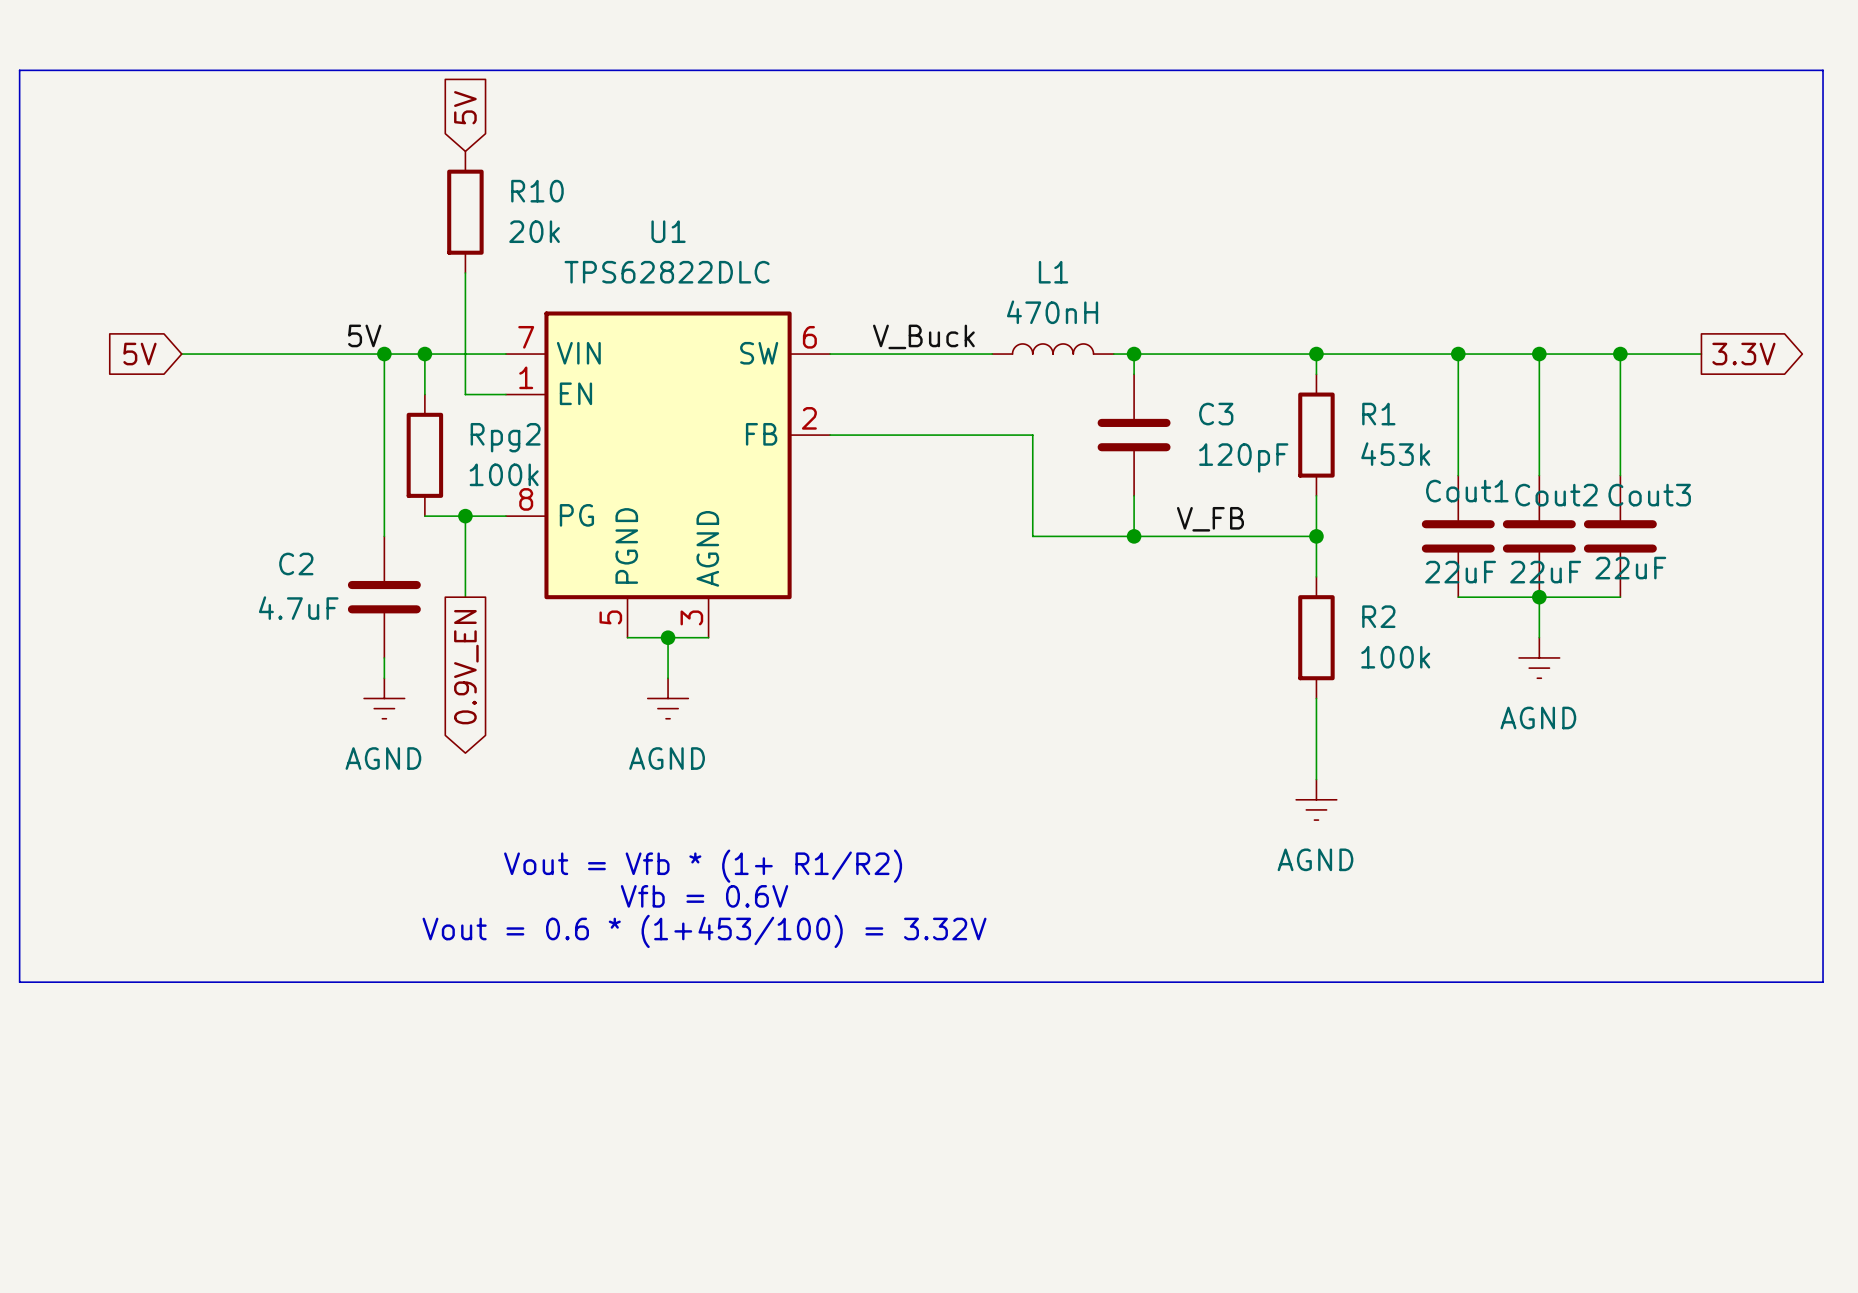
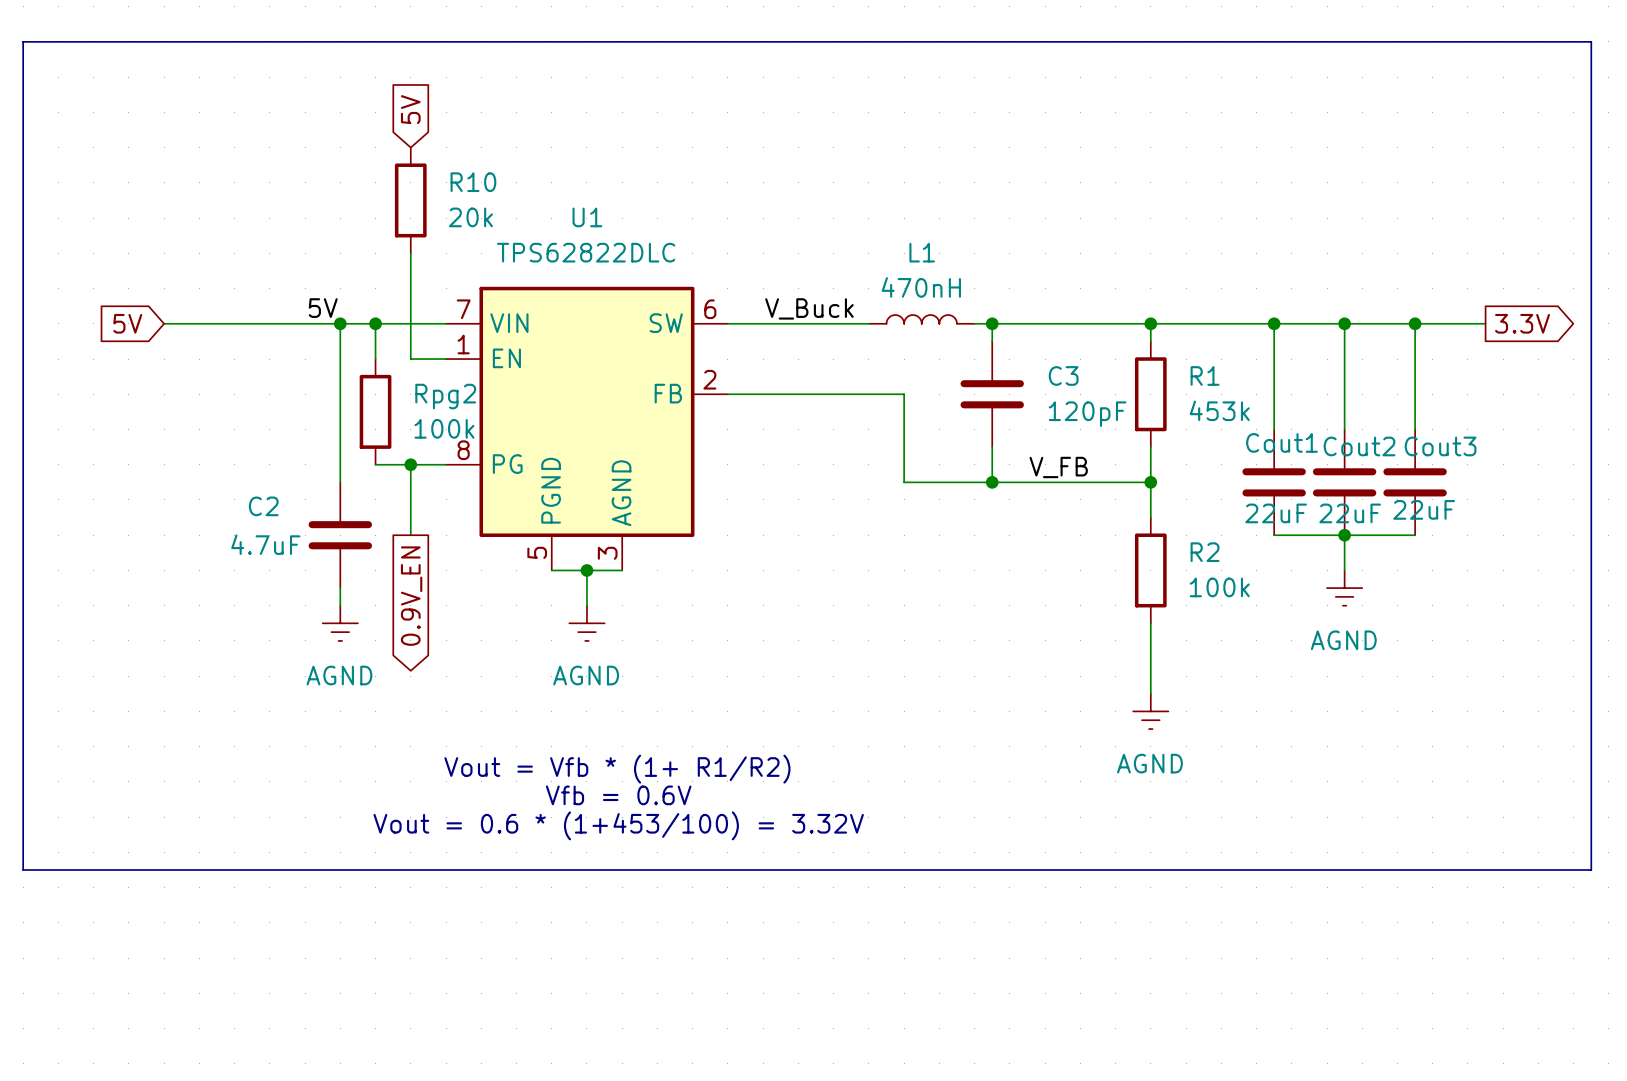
line: (19, 70) (1823, 70) -> (23, 77) (23, 41) (1591, 41) (1591, 77)

